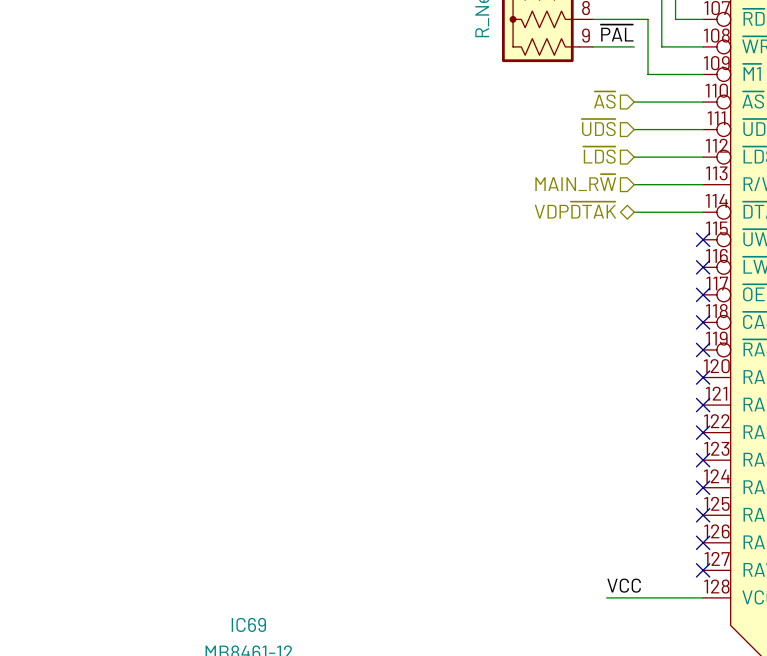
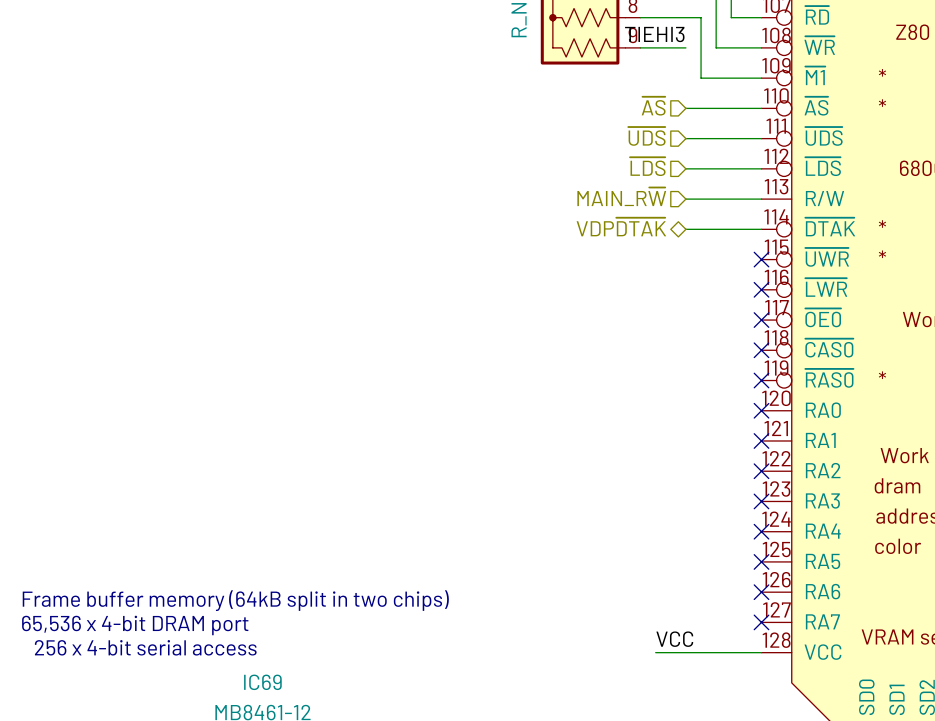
label: ~{PAL} (617, 33) -> TIEHI3 (654, 34)
text: none -> Frame buffer memory (64kB split in two chips) (235, 600)
text: none -> 65,536 x 4-bit DRAM port (135, 625)
text: none -> 256 x 4-bit serial access (145, 647)

